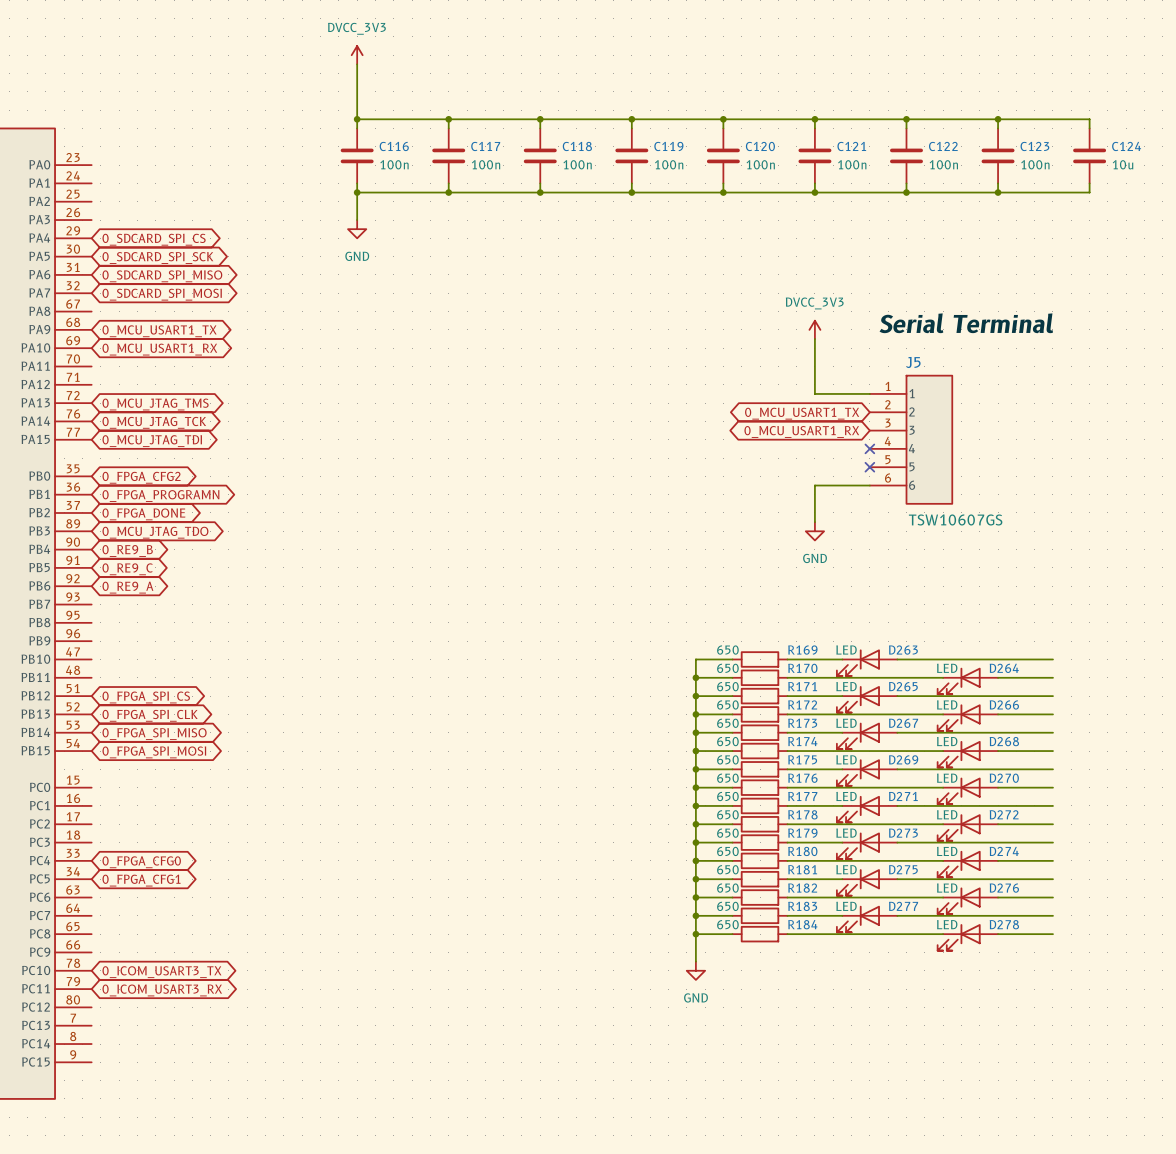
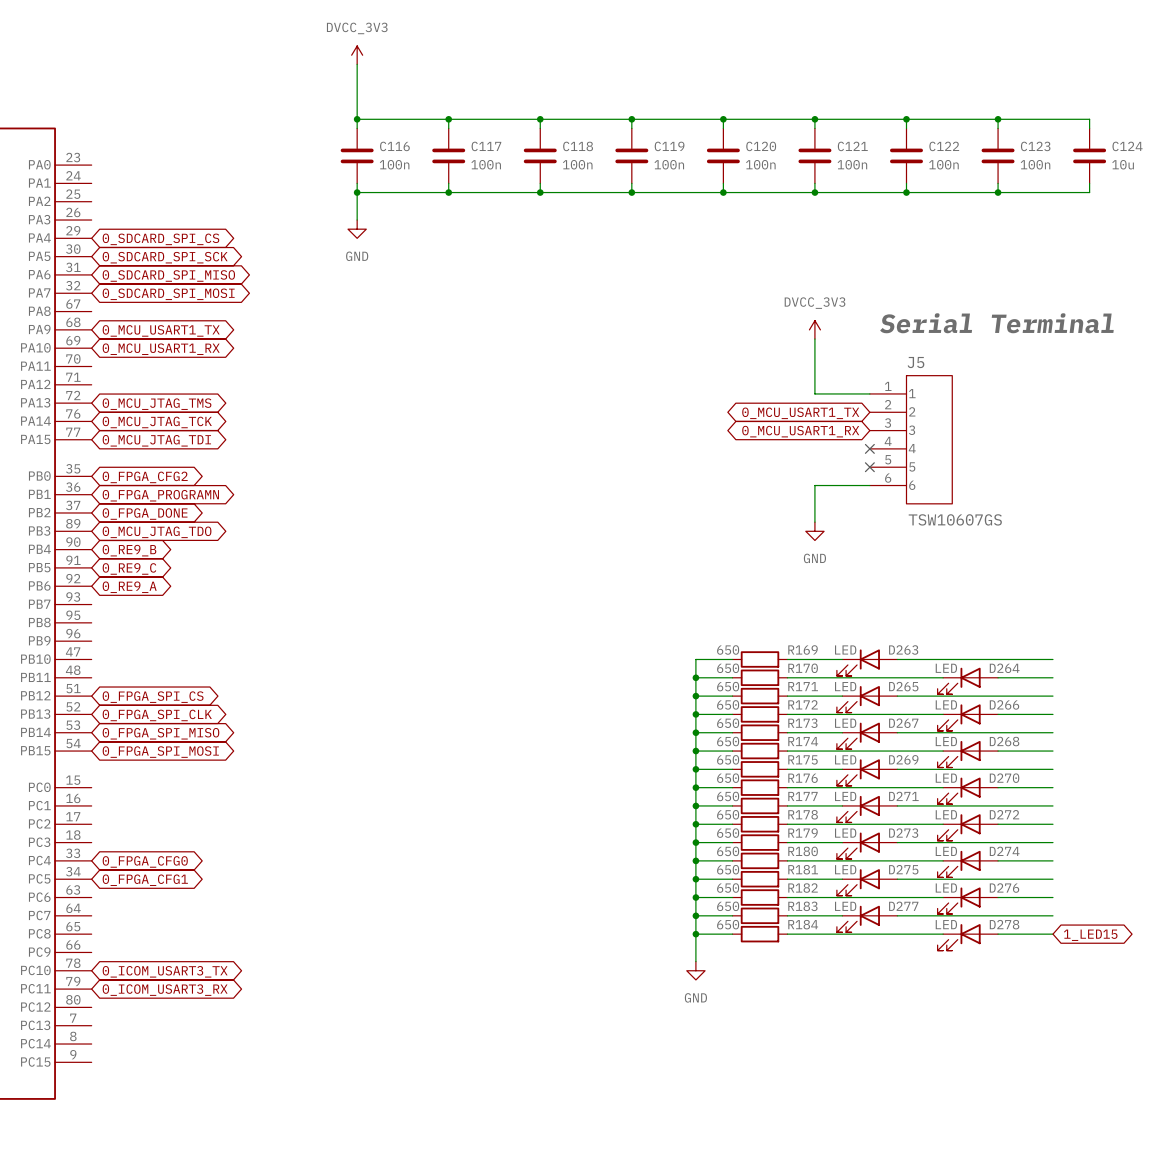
global label: none -> 1_LED15 (1090, 935)

